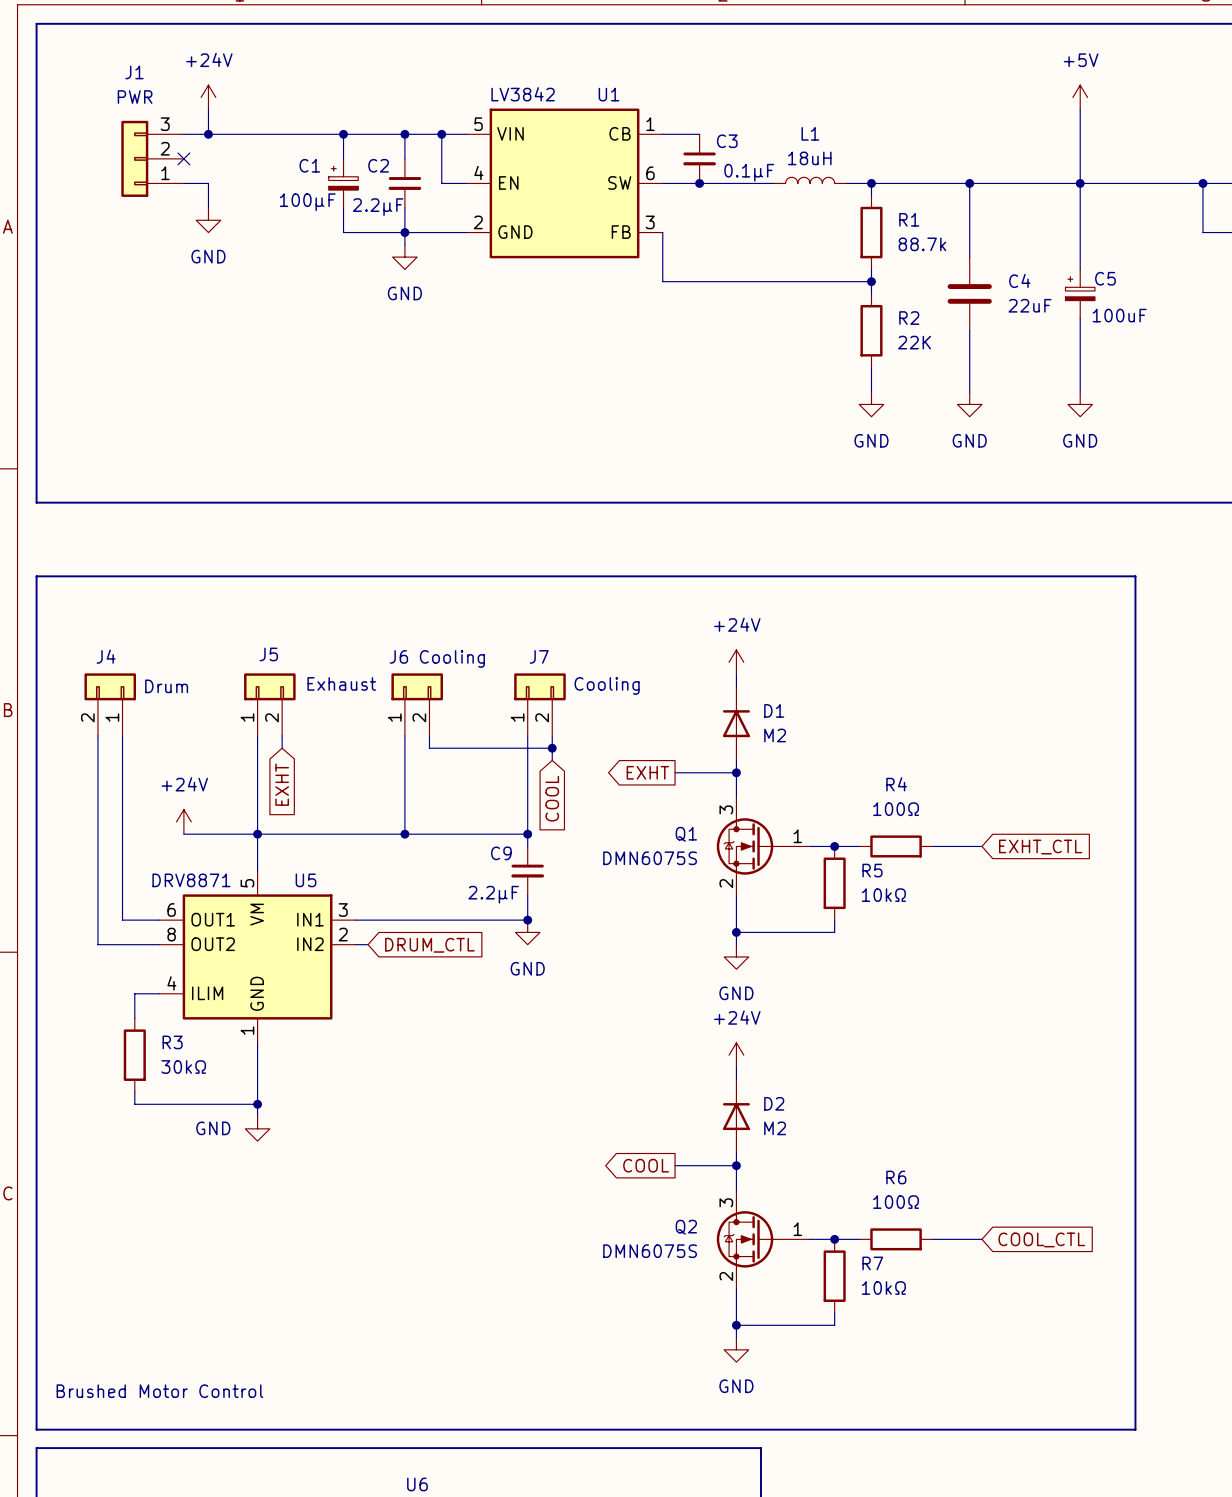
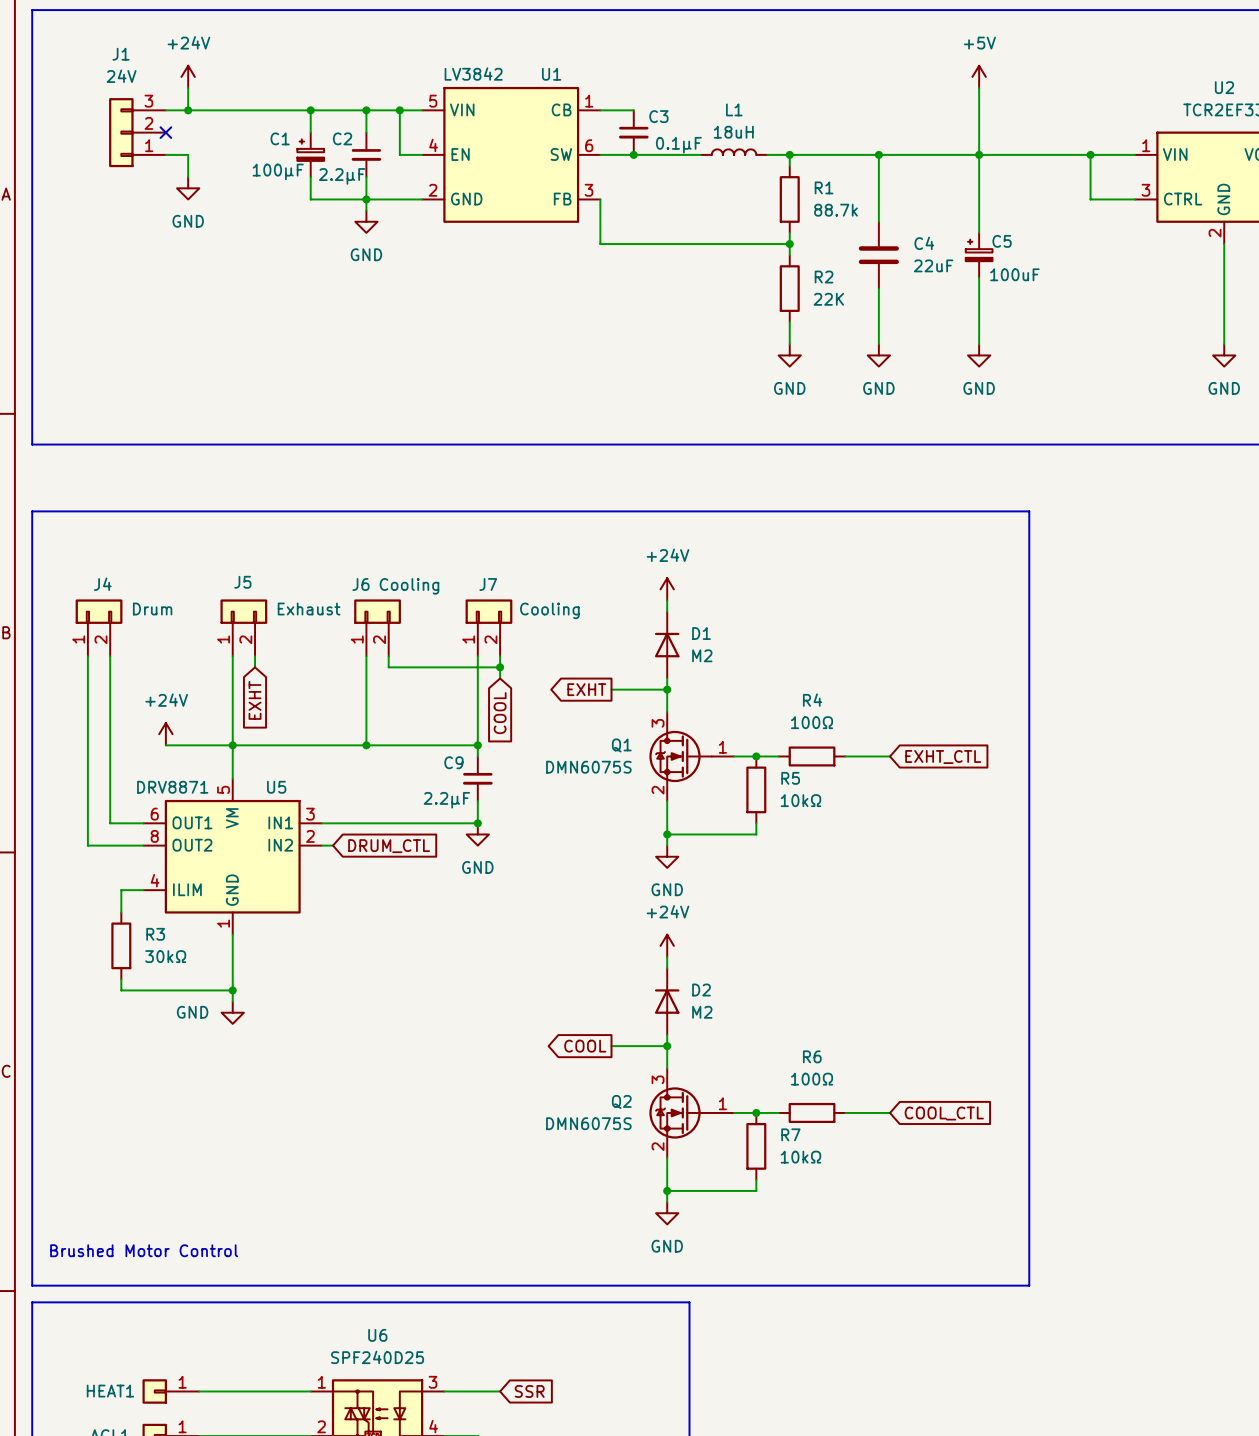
J1 value: PWR (135, 97) -> 24V (121, 76)
J4 flip: as is (110, 686) -> left-right (99, 611)

